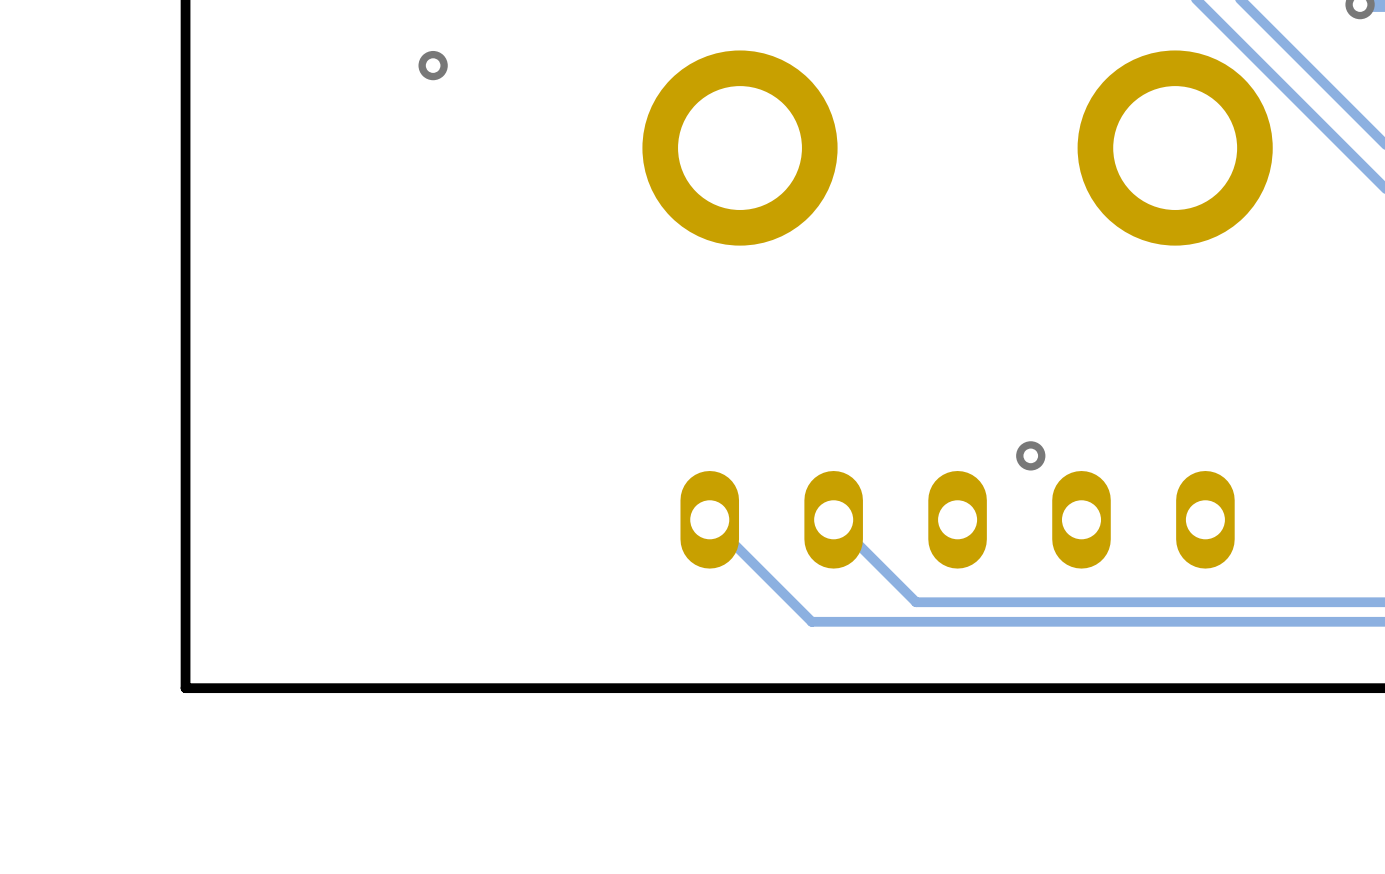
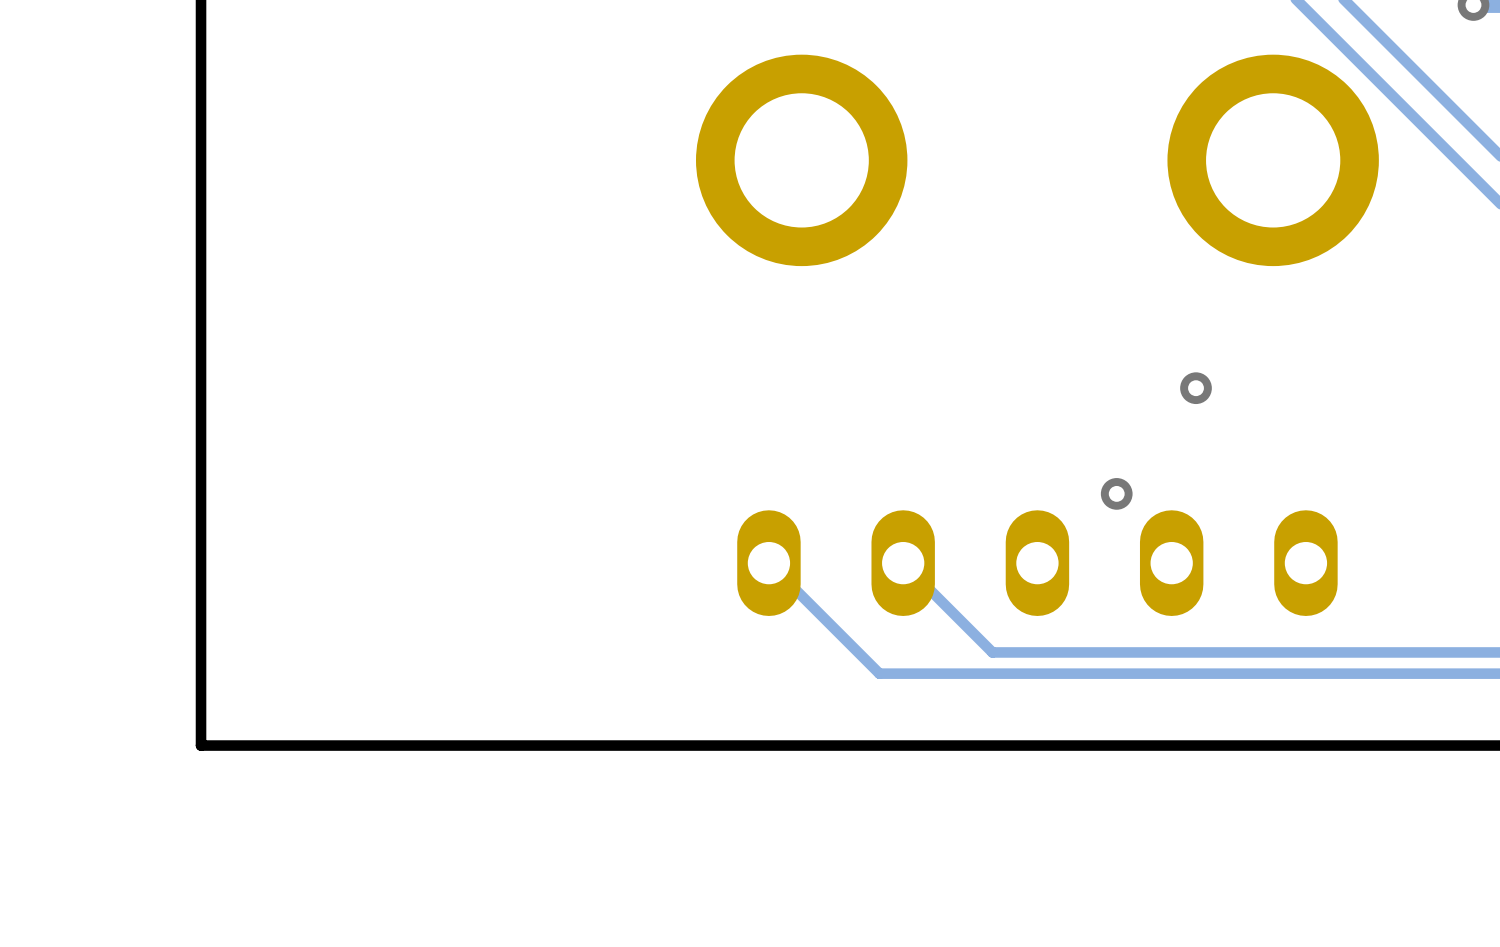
via: (433, 65) -> none
via: none -> (1196, 388)

